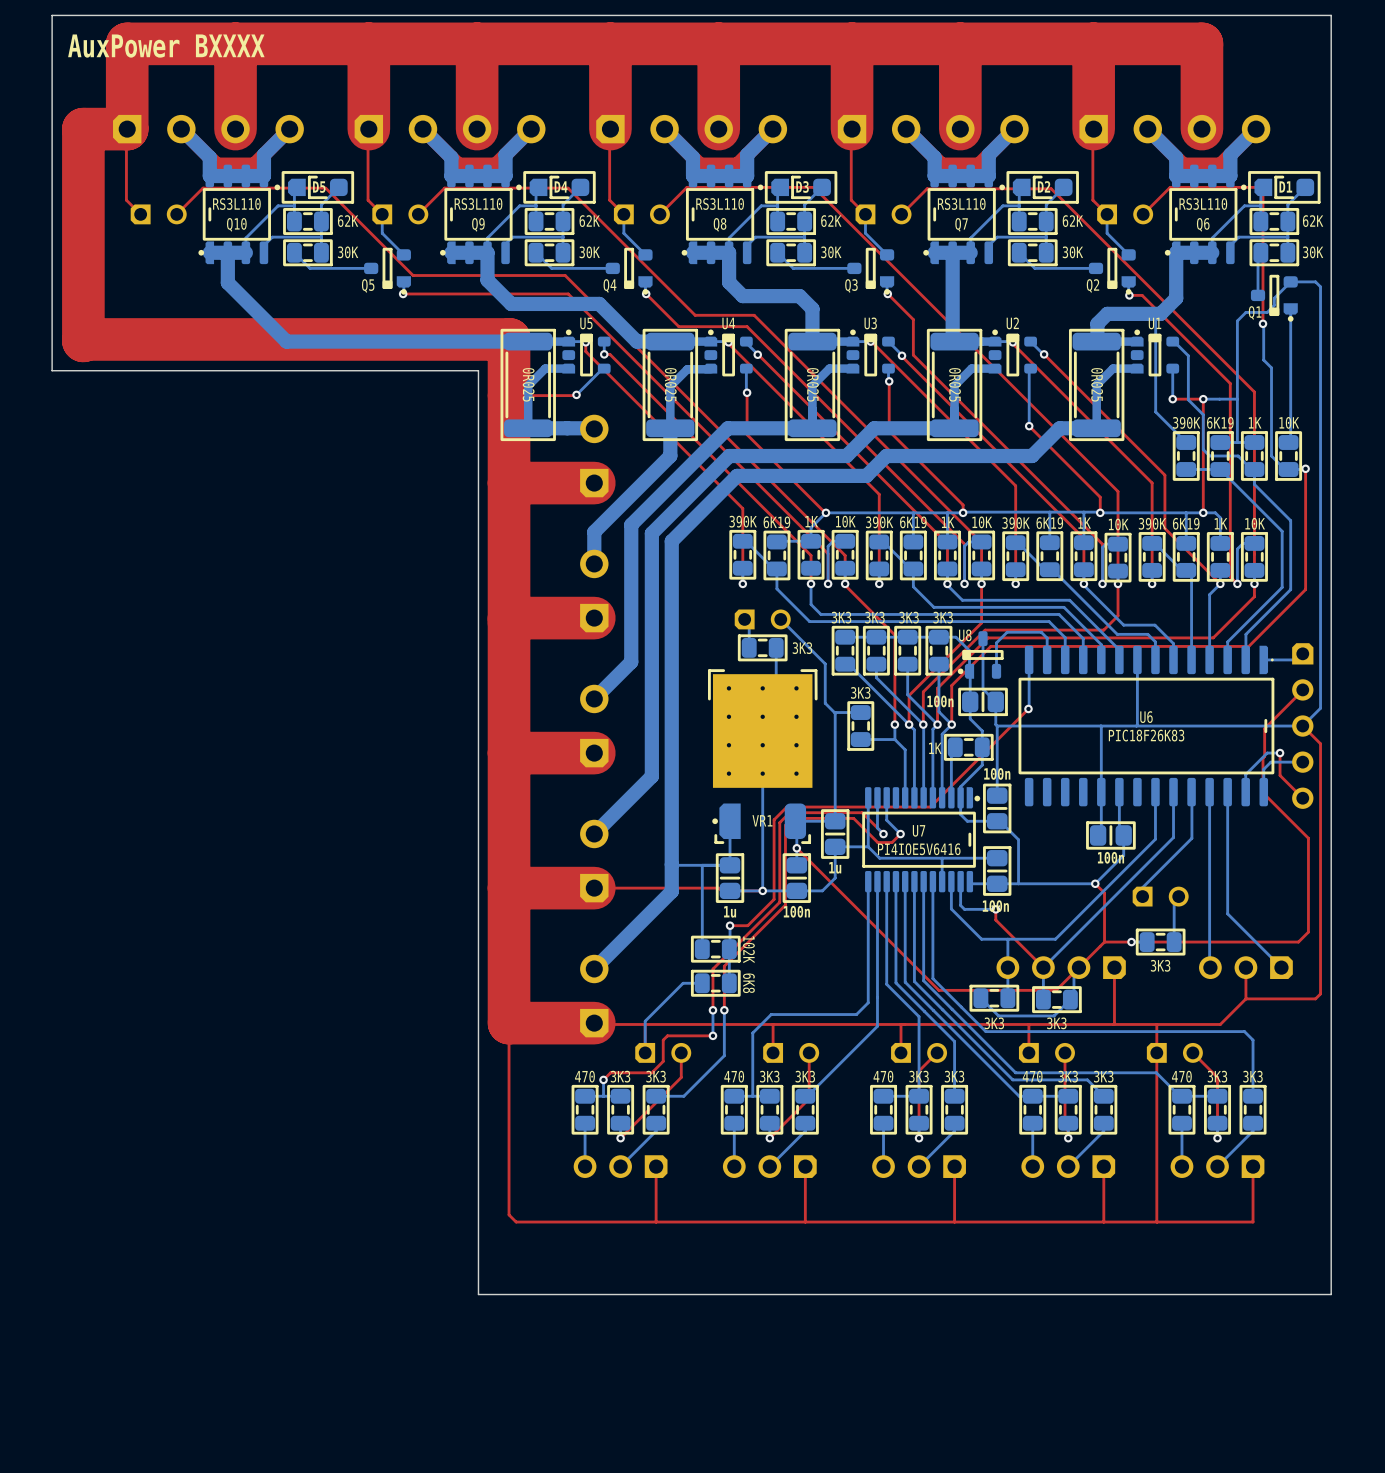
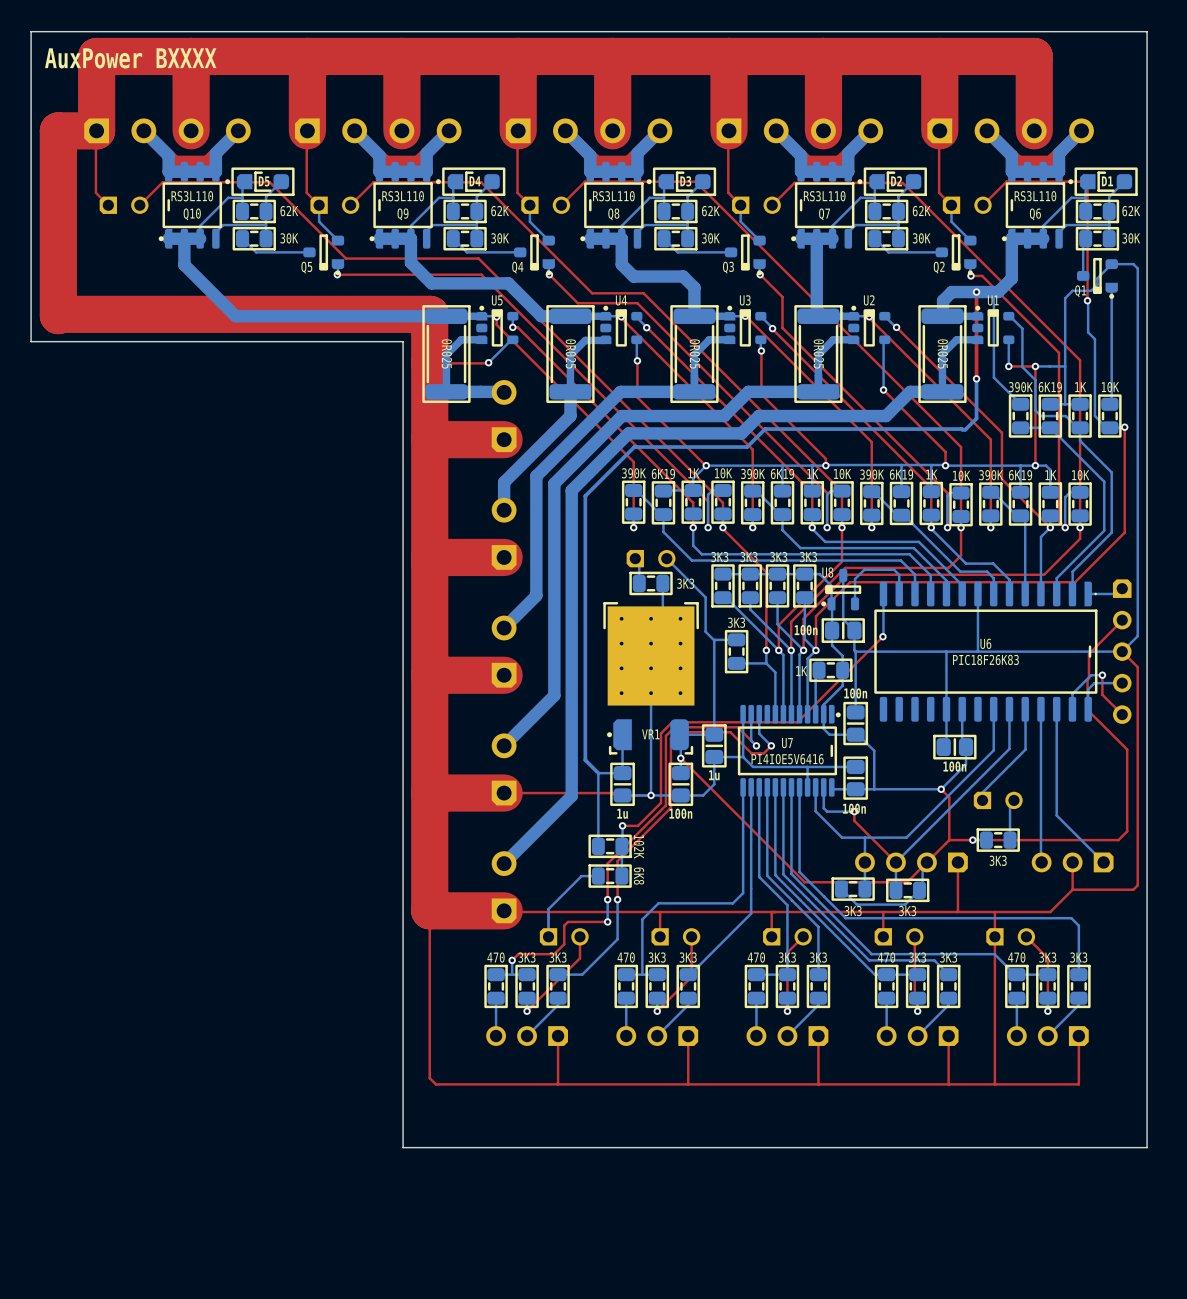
top track: none -> (976, 292) (976, 378)
via: none -> (976, 292)
via: none -> (976, 378)
bottom track: (671, 864) (702, 865) -> (976, 378) (976, 418) (965, 429) (765, 429) (747, 447) (634, 447) (585, 496) (585, 760) (598, 773)

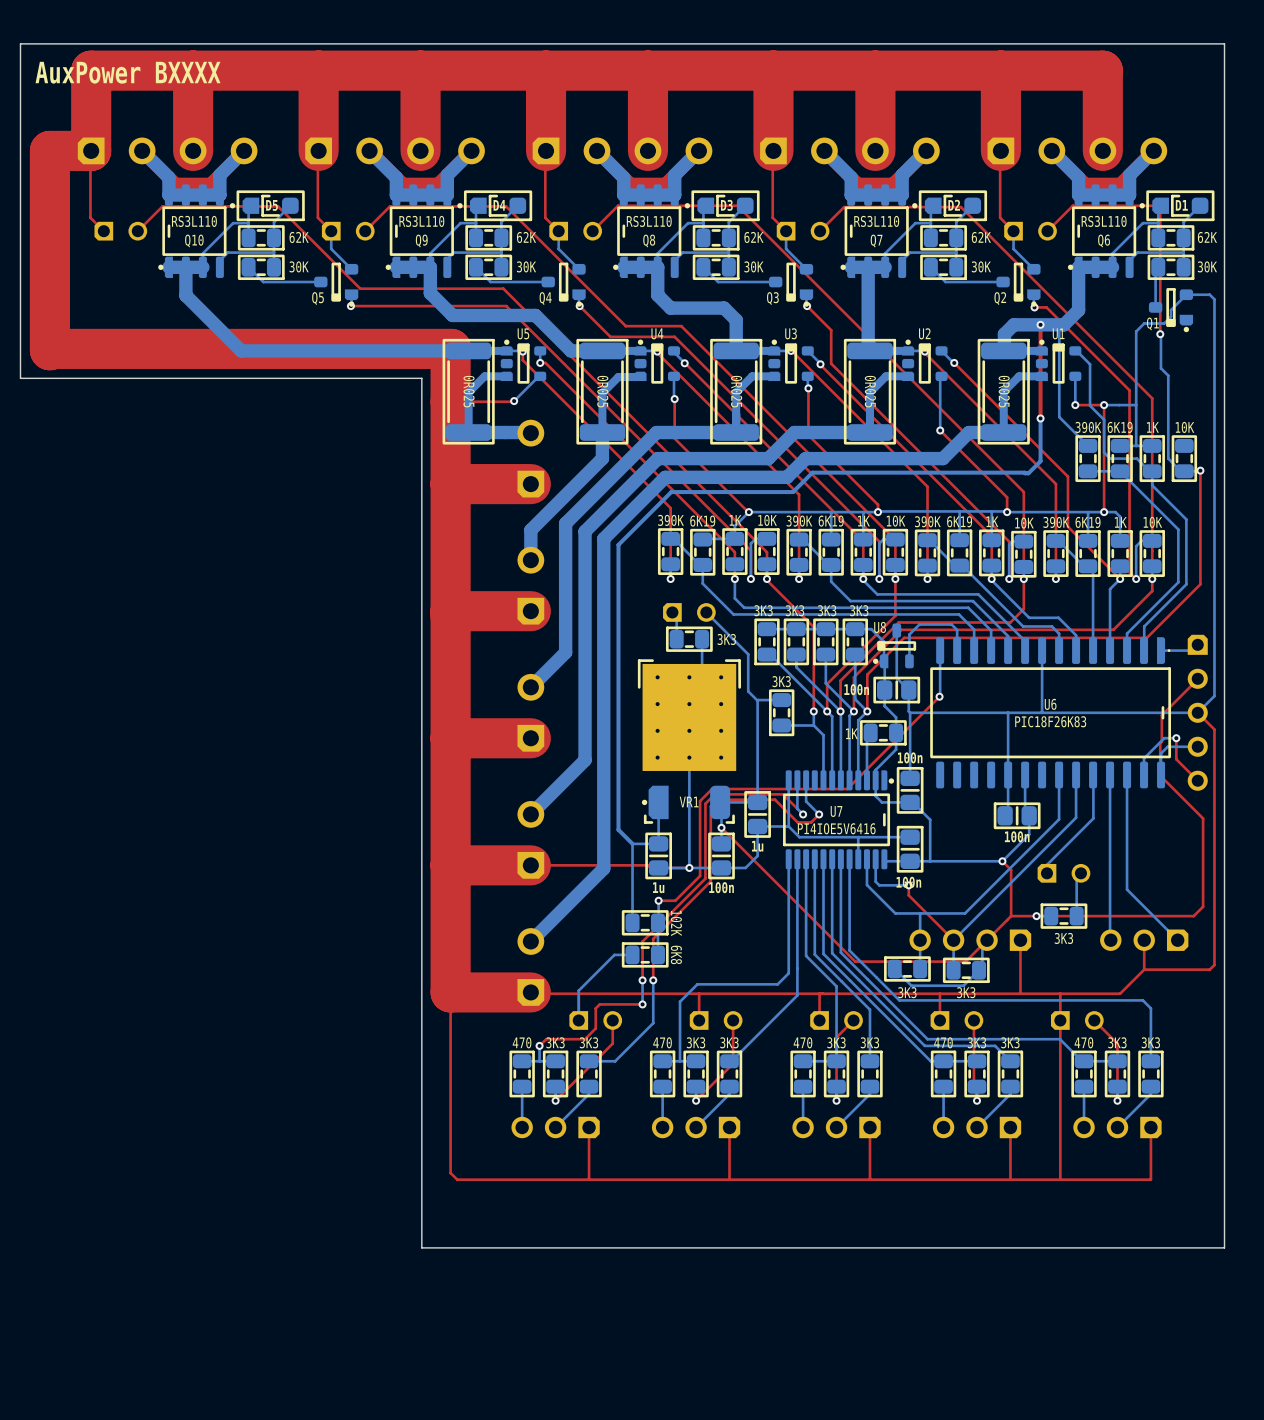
bottom track: (1111, 287) (1111, 402) (1109, 404) -> none

